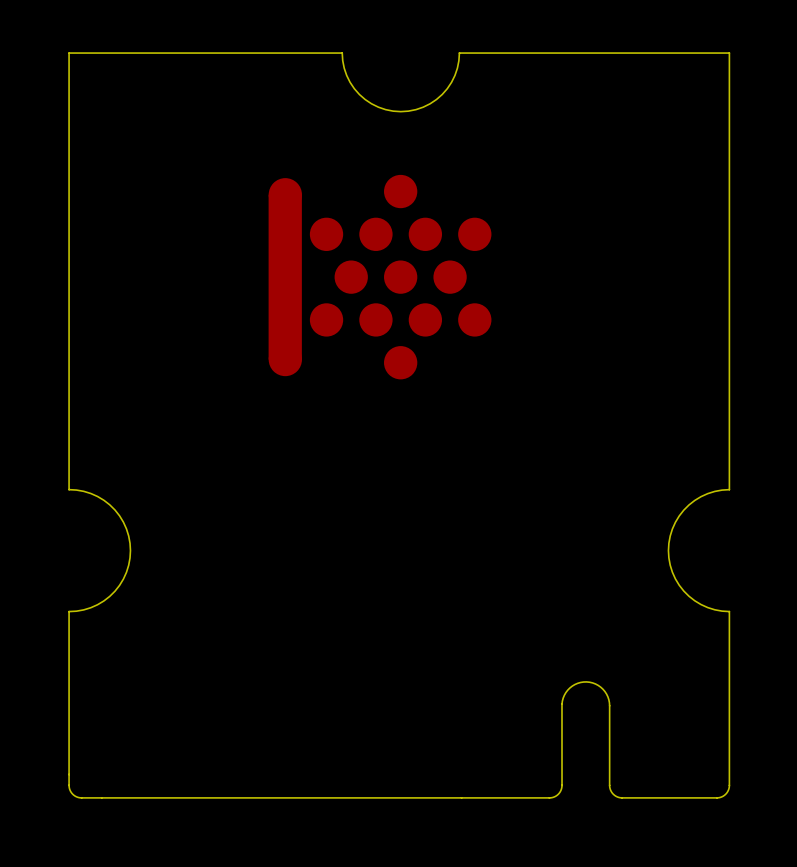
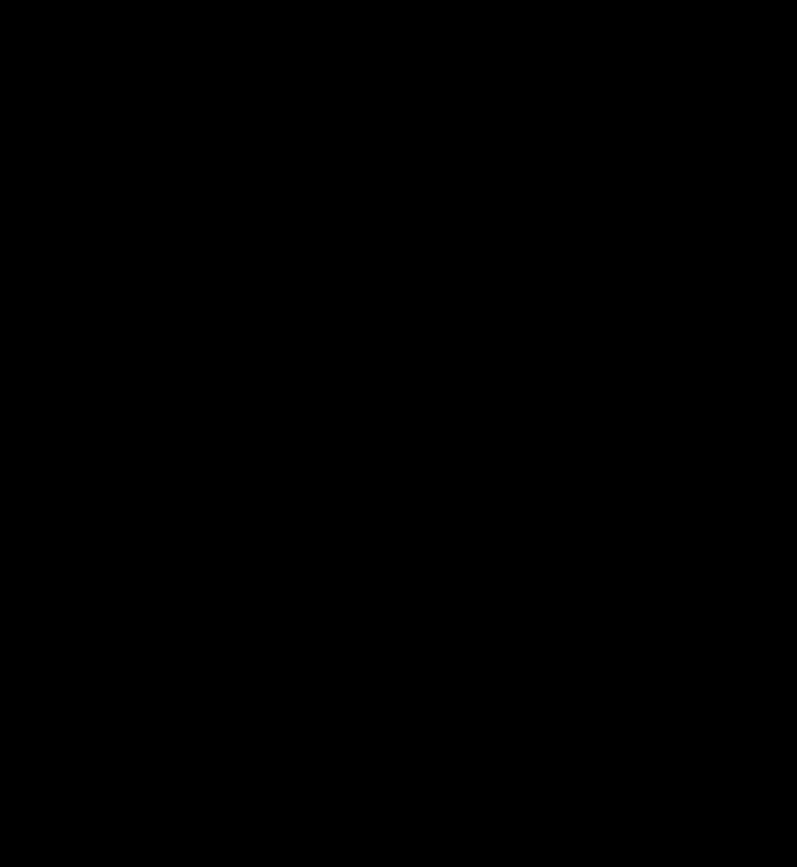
board edge: (69, 53) (342, 53) (346, 75) (359, 94) (378, 107) (400, 111) (423, 107) (442, 94) (454, 75) (459, 53) (729, 53) (729, 489) (707, 493) (688, 504) (679, 515) (672, 529) (668, 550) (672, 572) (679, 585) (688, 596) (707, 607) (729, 611) (729, 785) (725, 794) (716, 797) (622, 797) (614, 795) (609, 785) (608, 699) (600, 687) (586, 681) (572, 686) (563, 698) (561, 786) (559, 793) (552, 797) (81, 797) (71, 793) (69, 785) (69, 611) (83, 609) (97, 604) (115, 591) (126, 572) (130, 550) (126, 528) (115, 510) (103, 500) (90, 493) (69, 489) (69, 53) -> none
drawing: [268, 174, 492, 380] -> none

